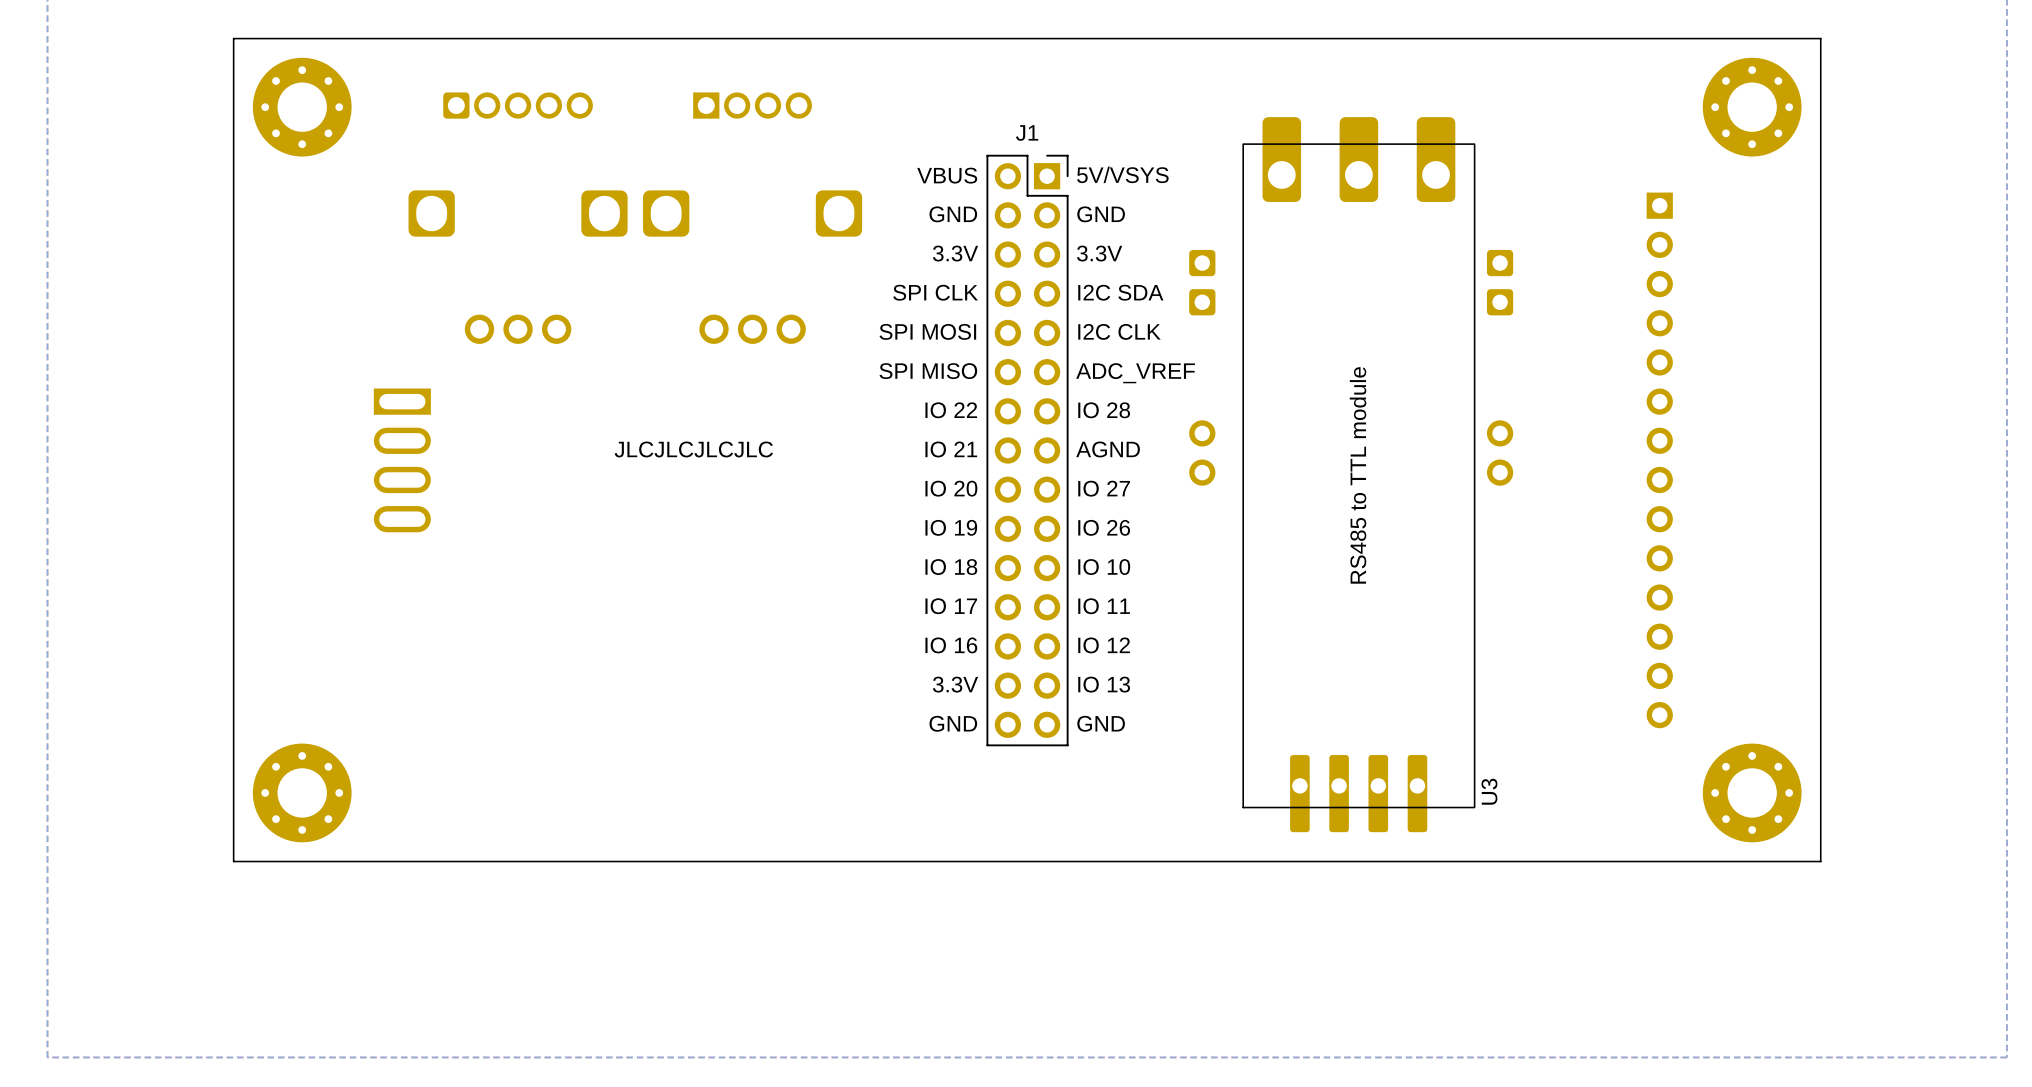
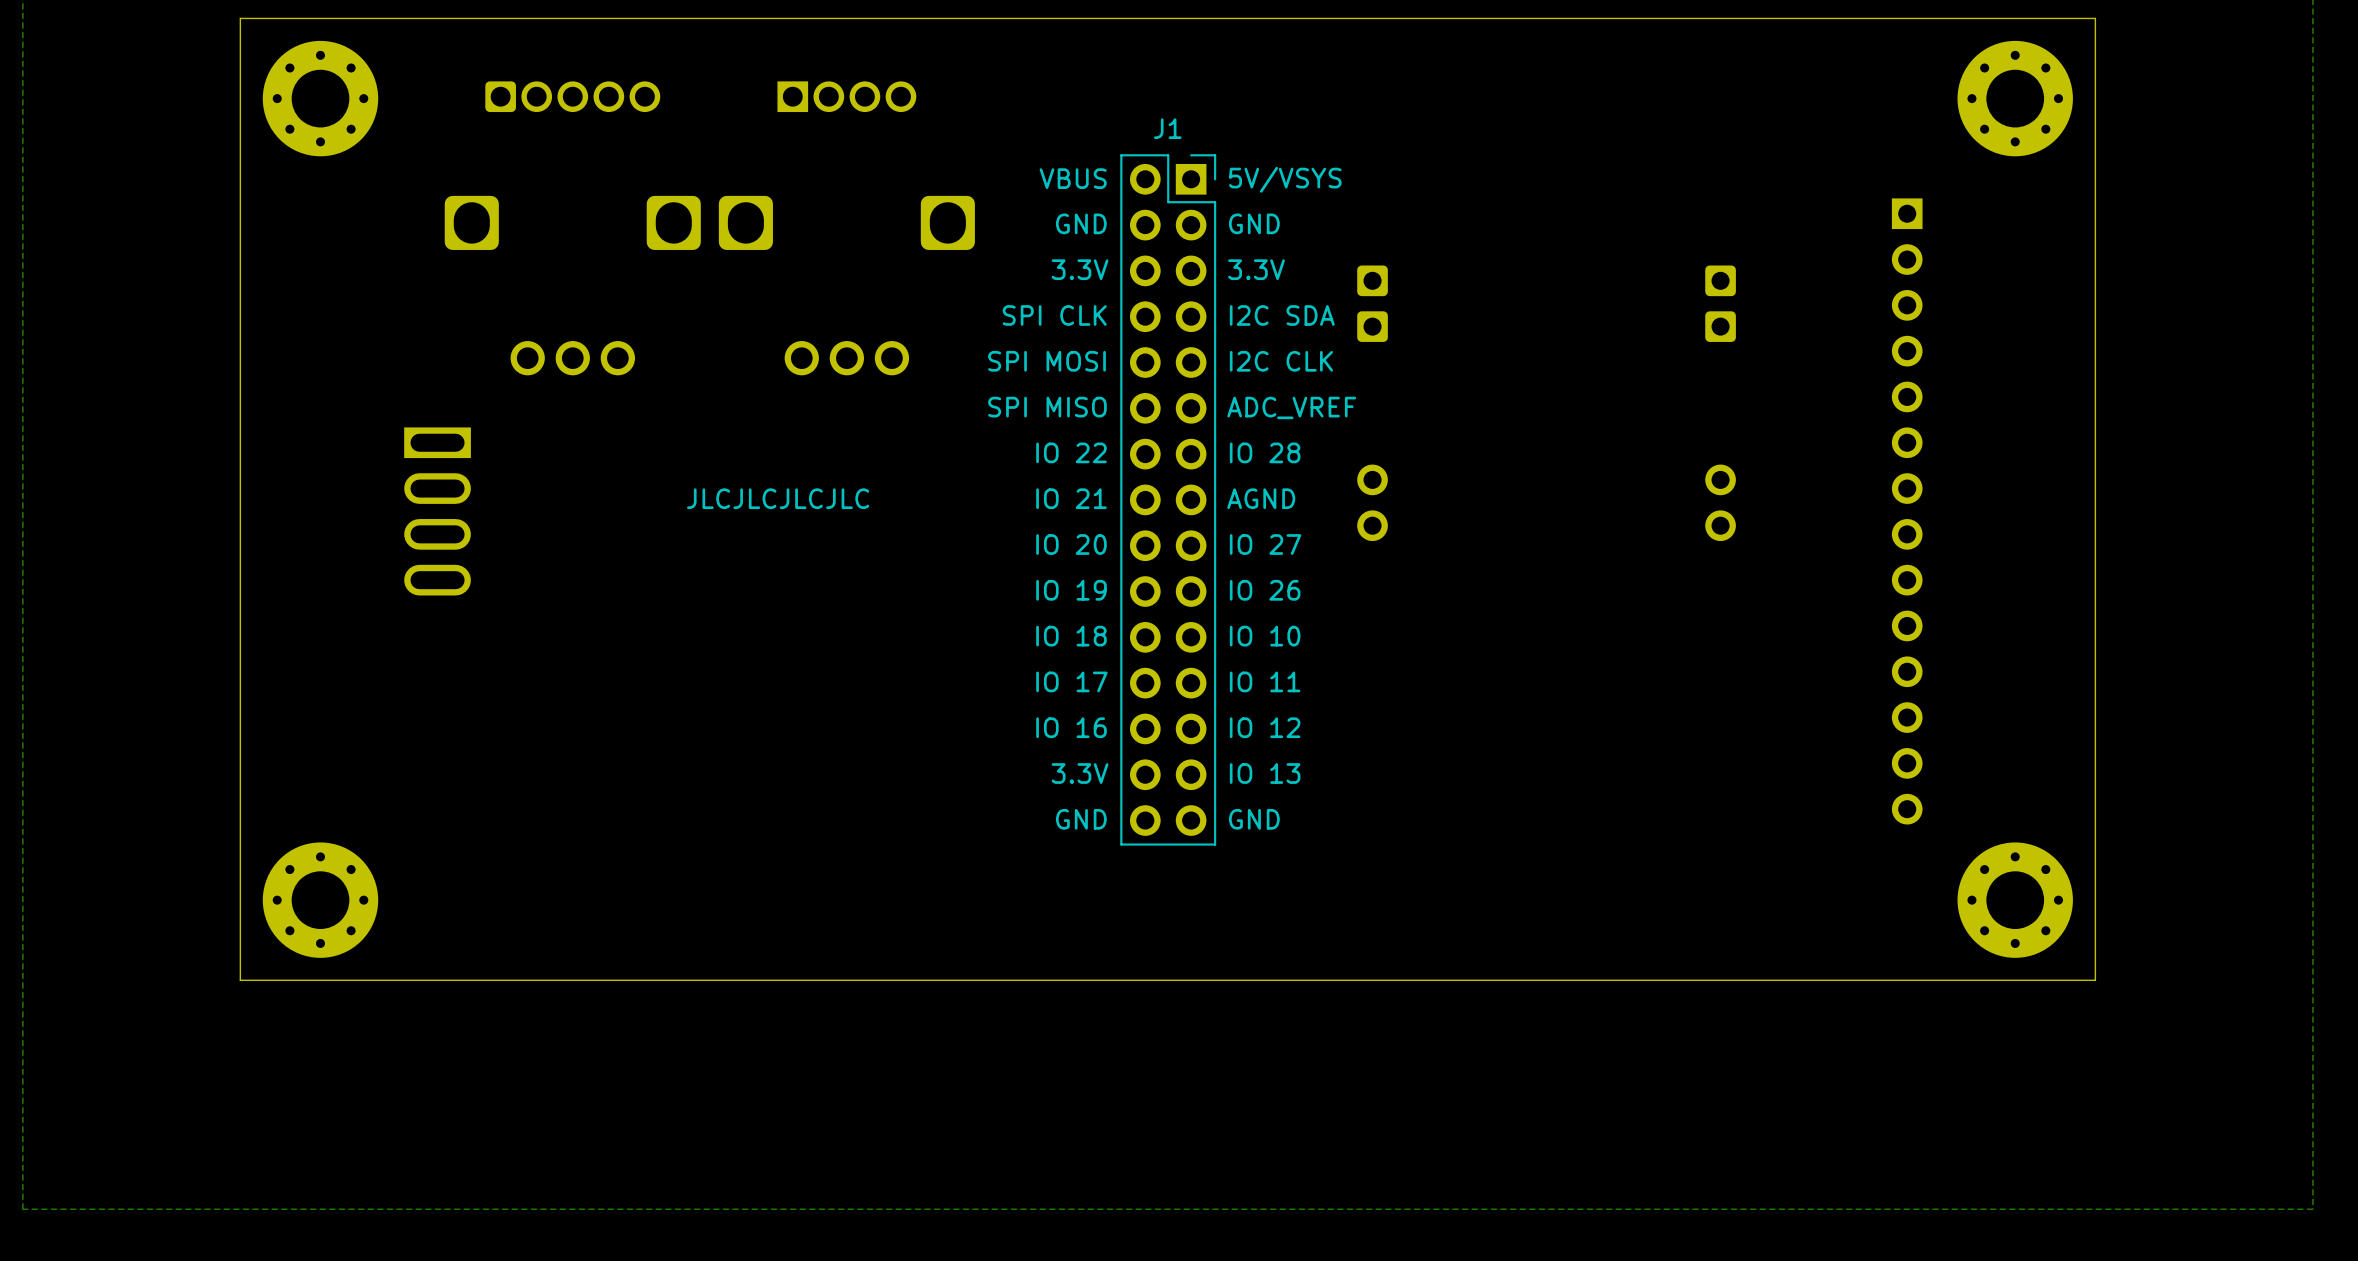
U3: RS485 to TTL module (1358, 474) -> none

